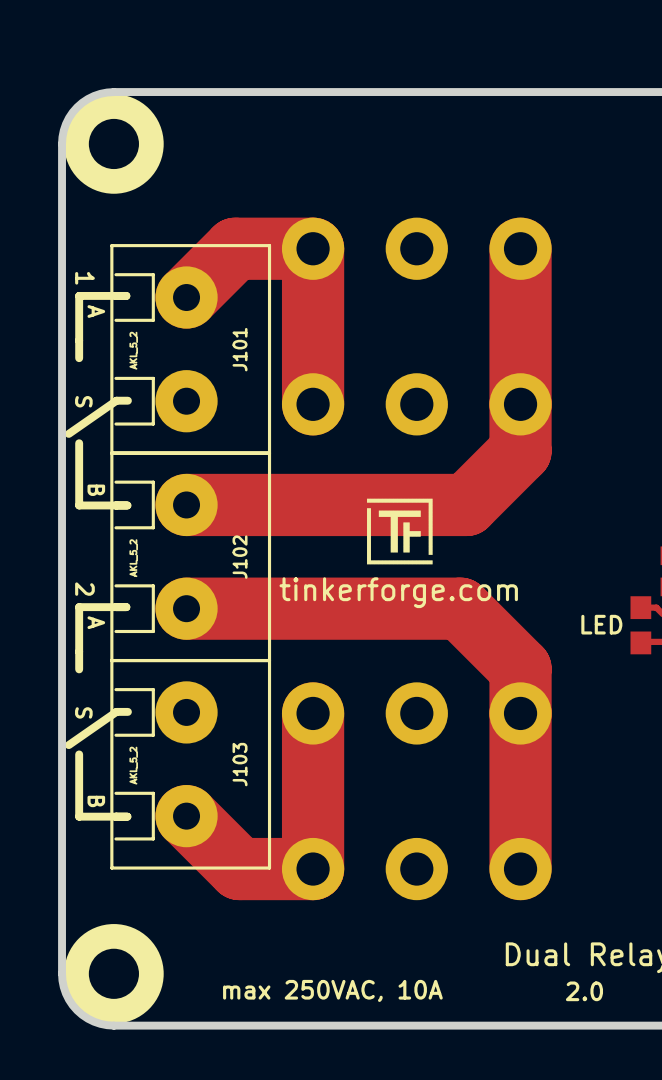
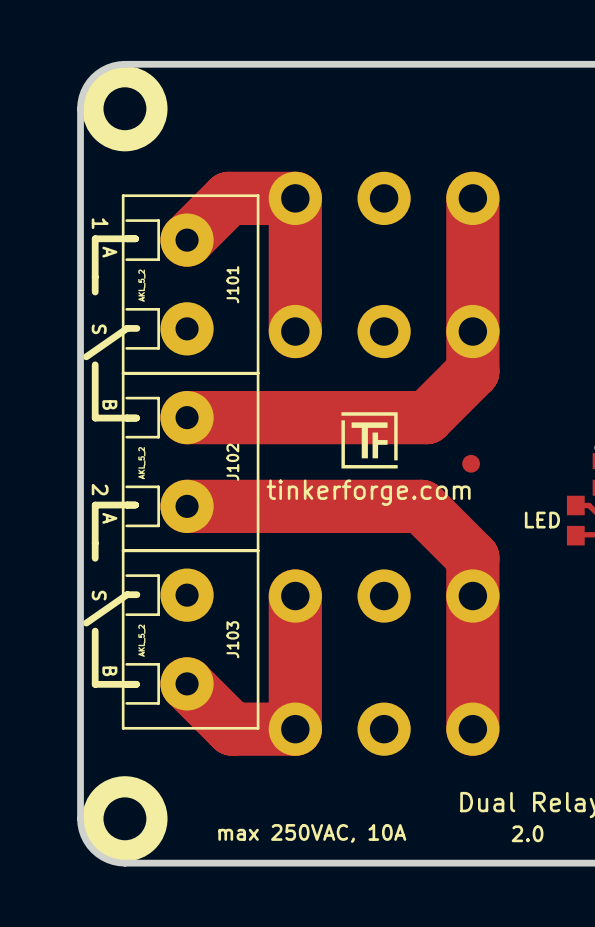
part: none -> (471, 463)

